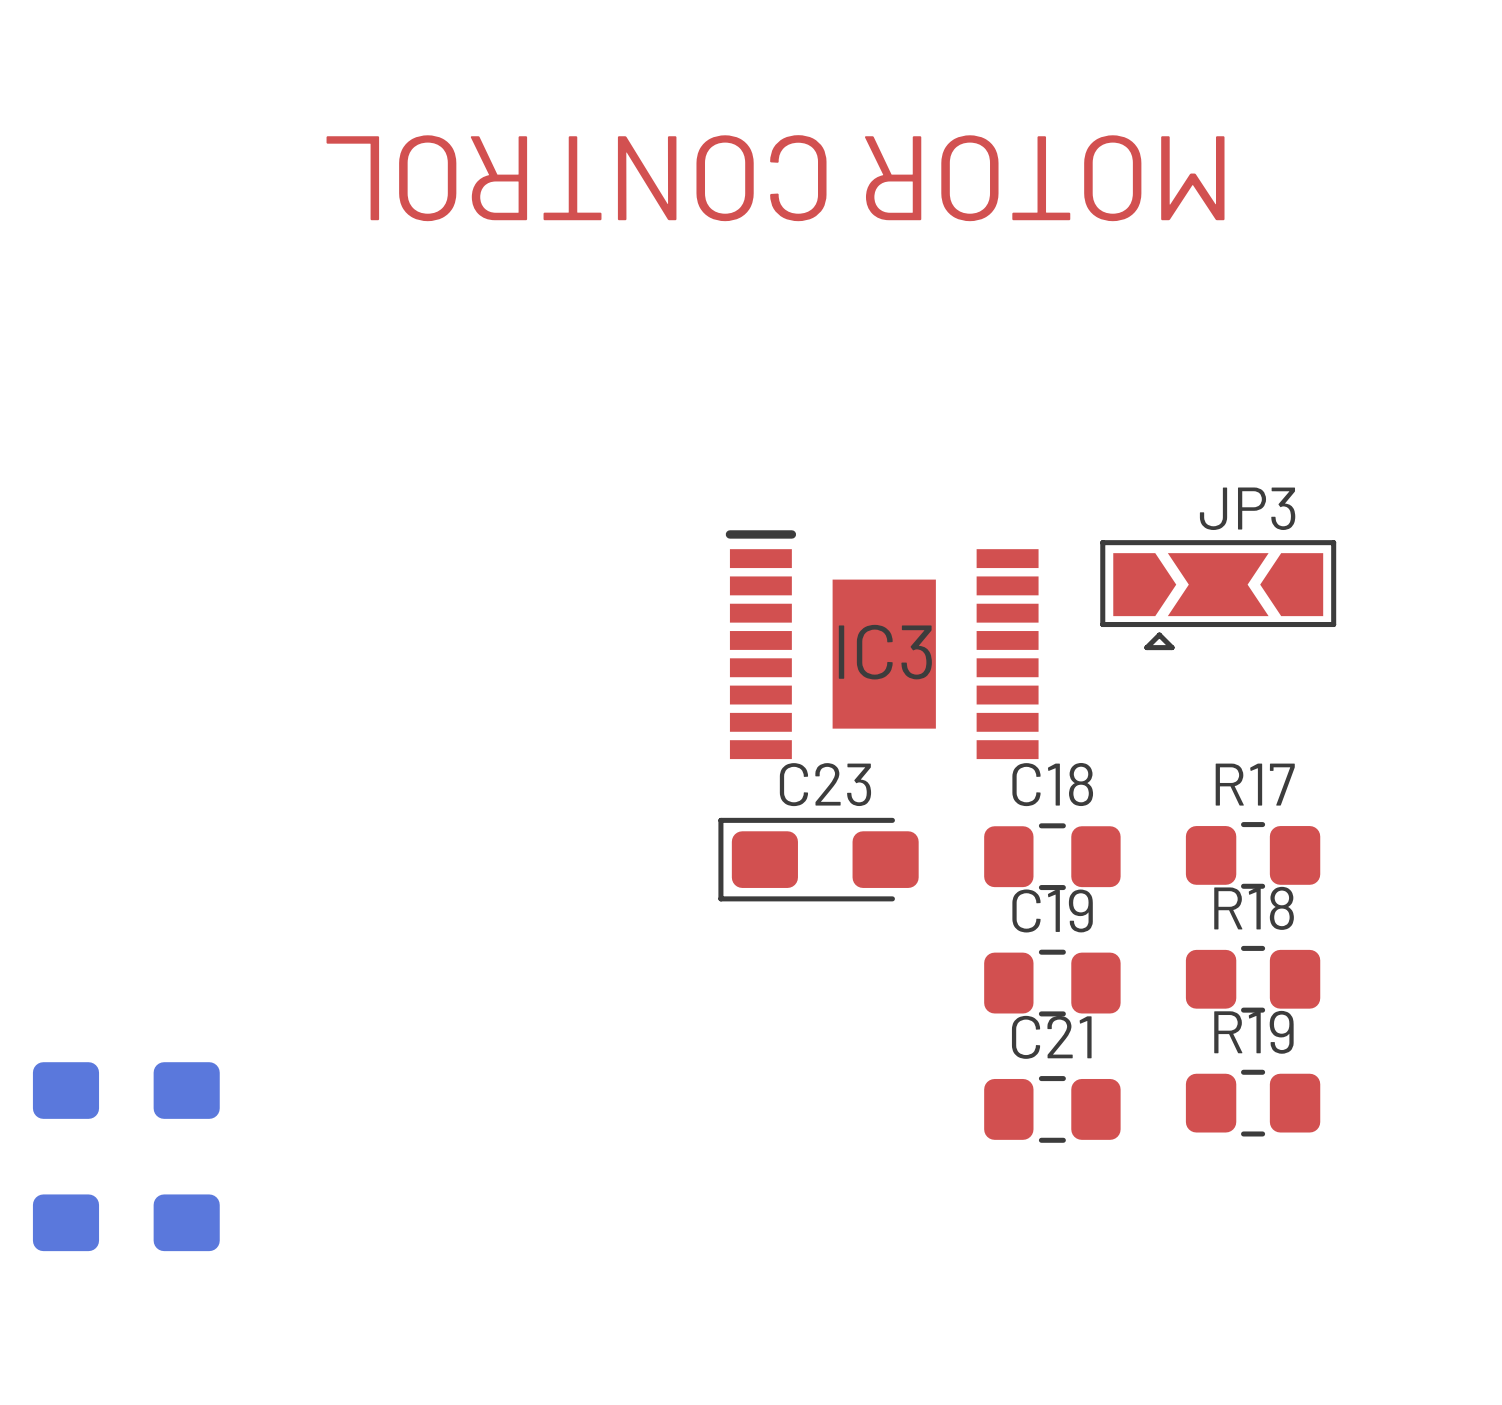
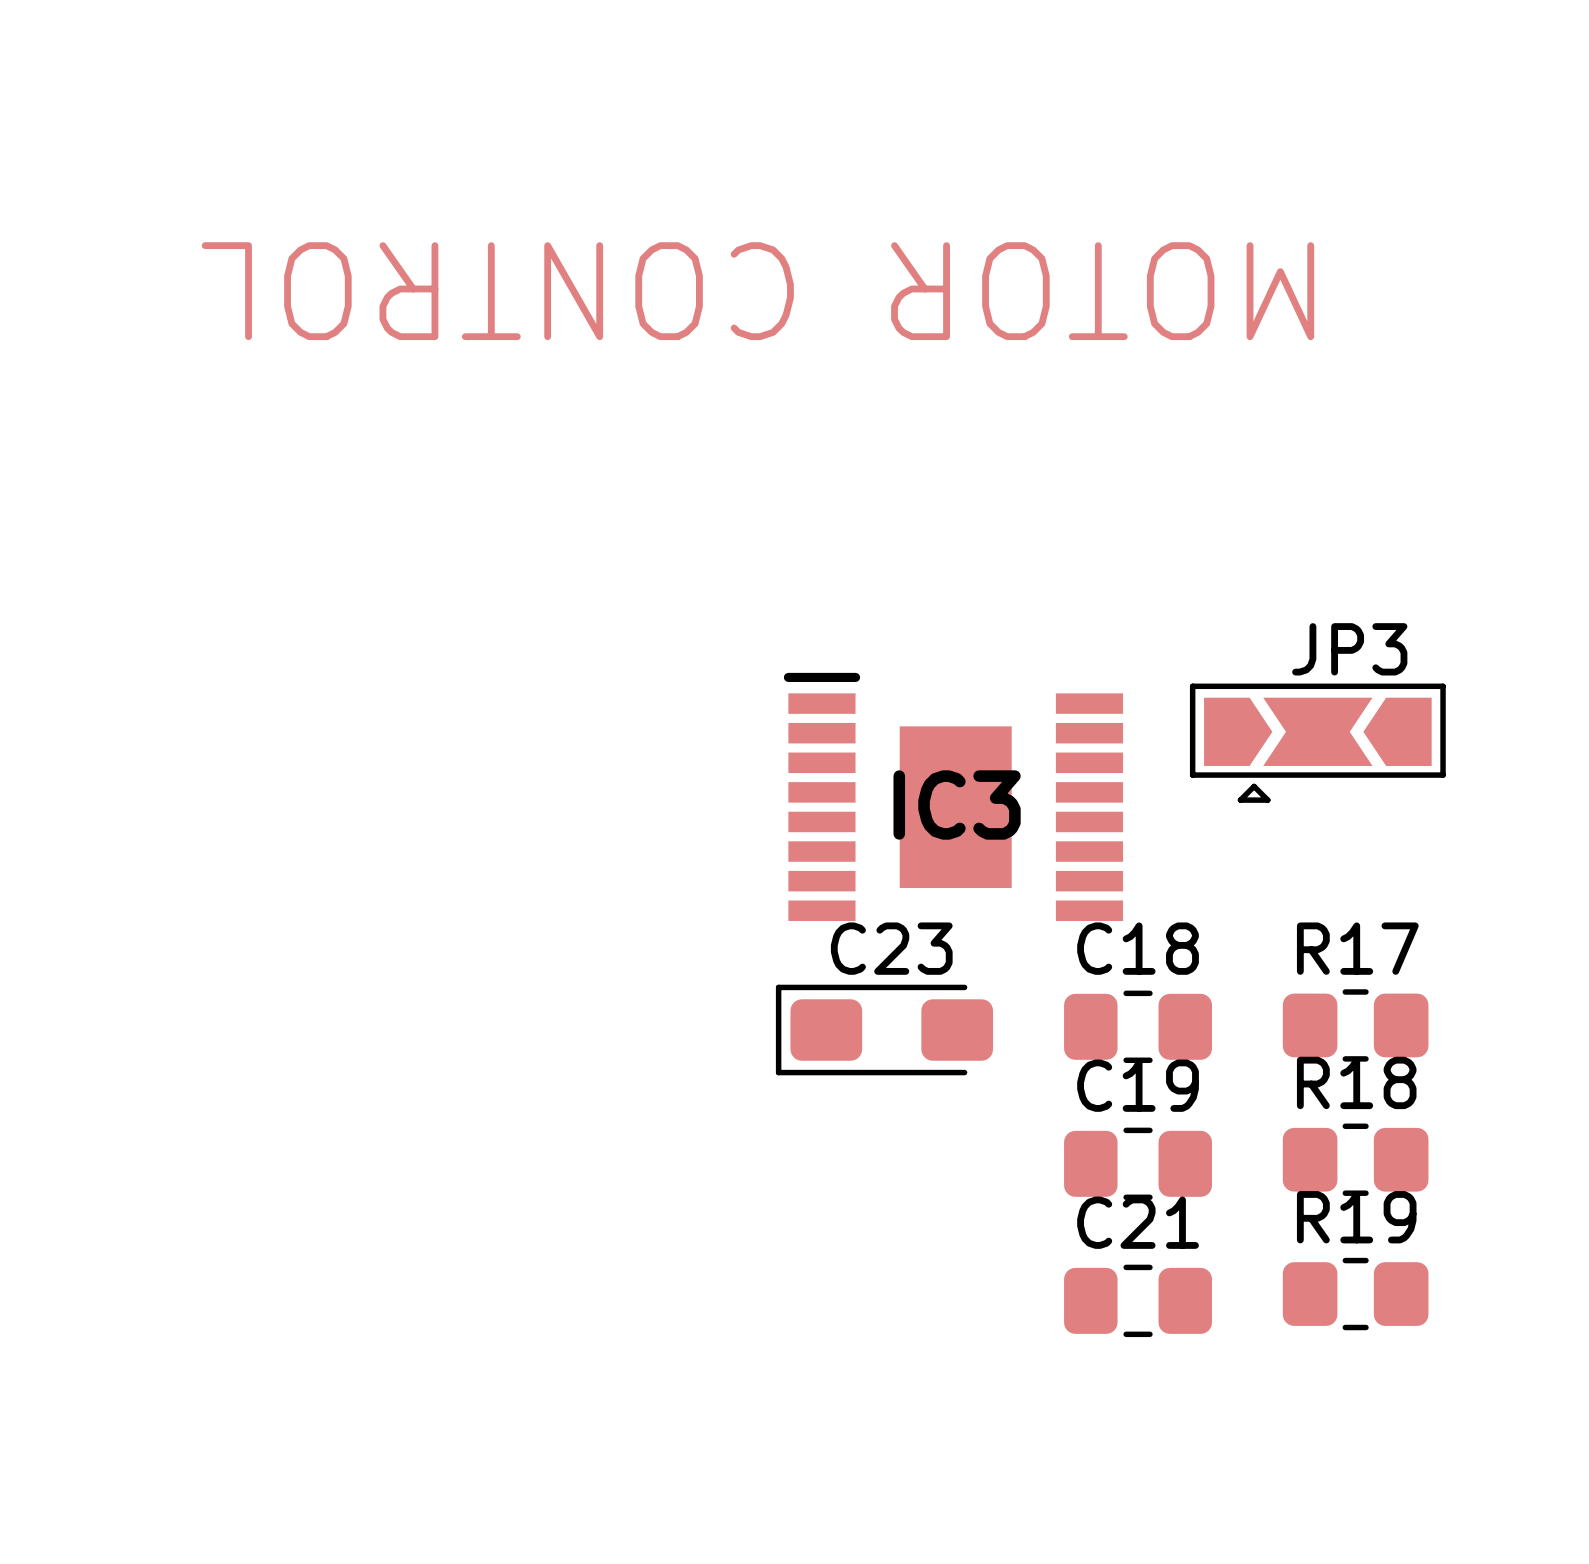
part: (126, 1090) -> none
part: (126, 1222) -> none

